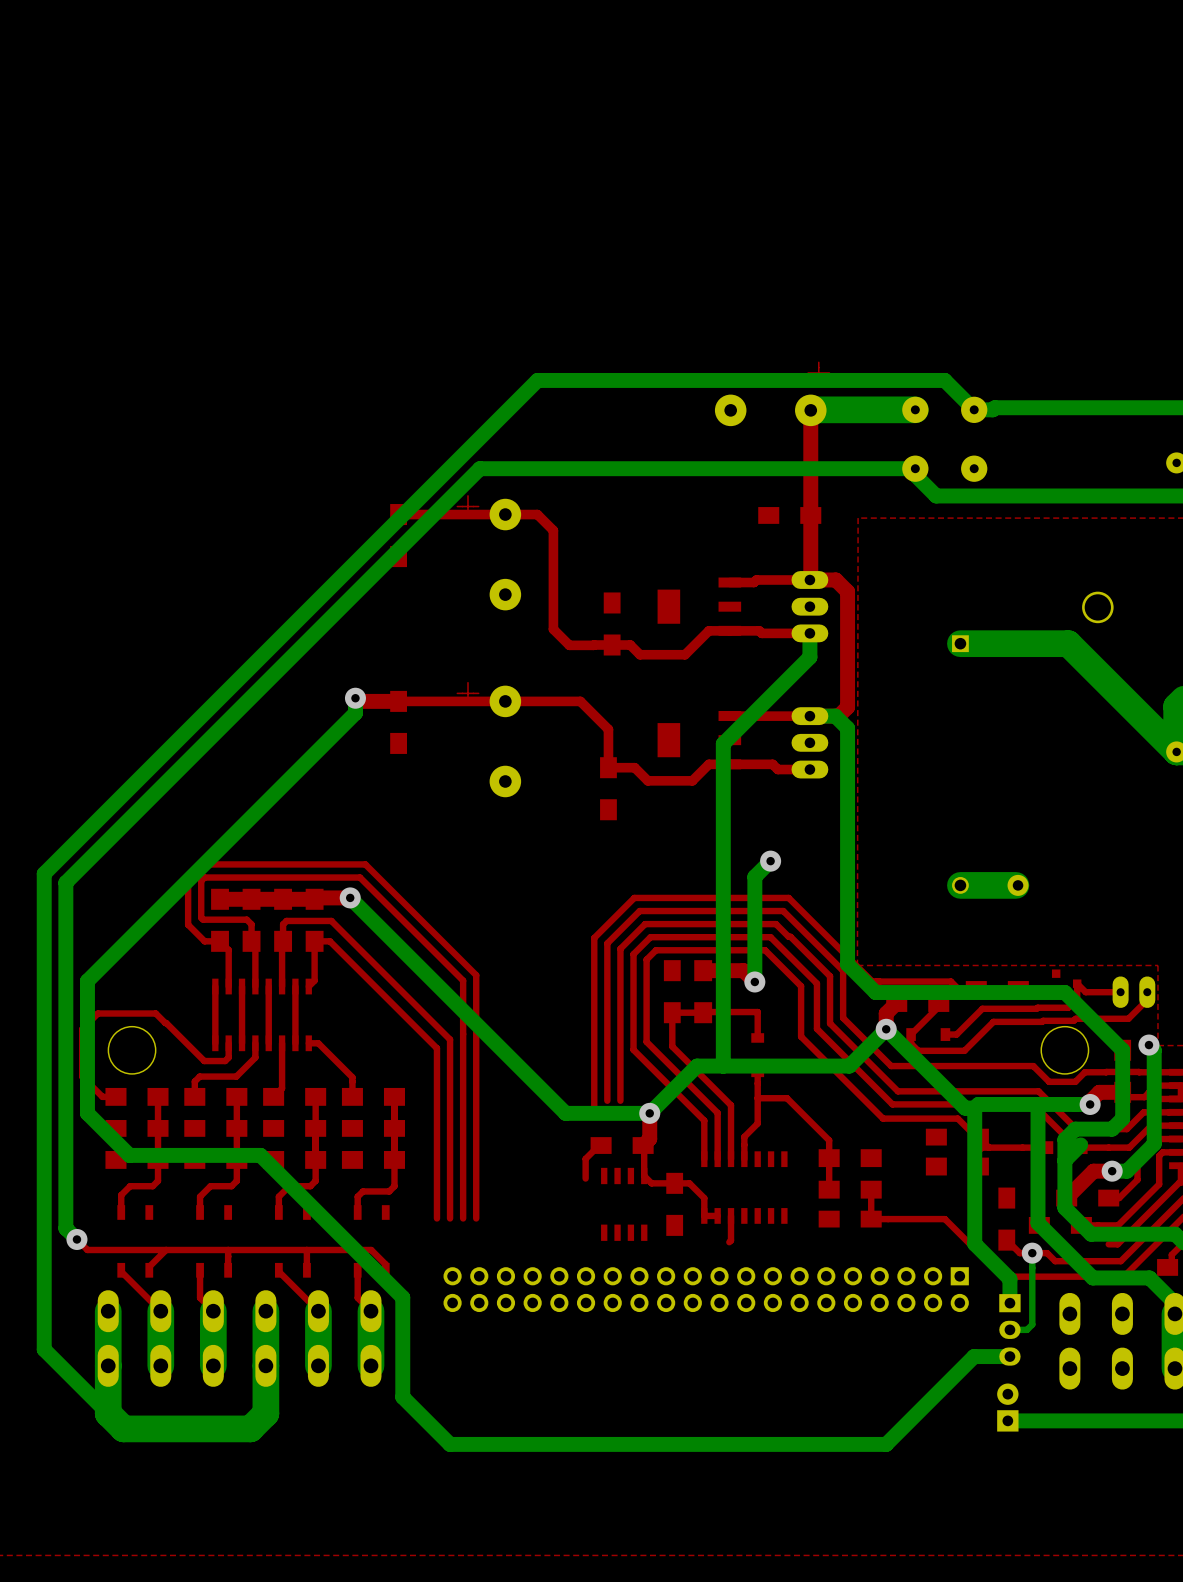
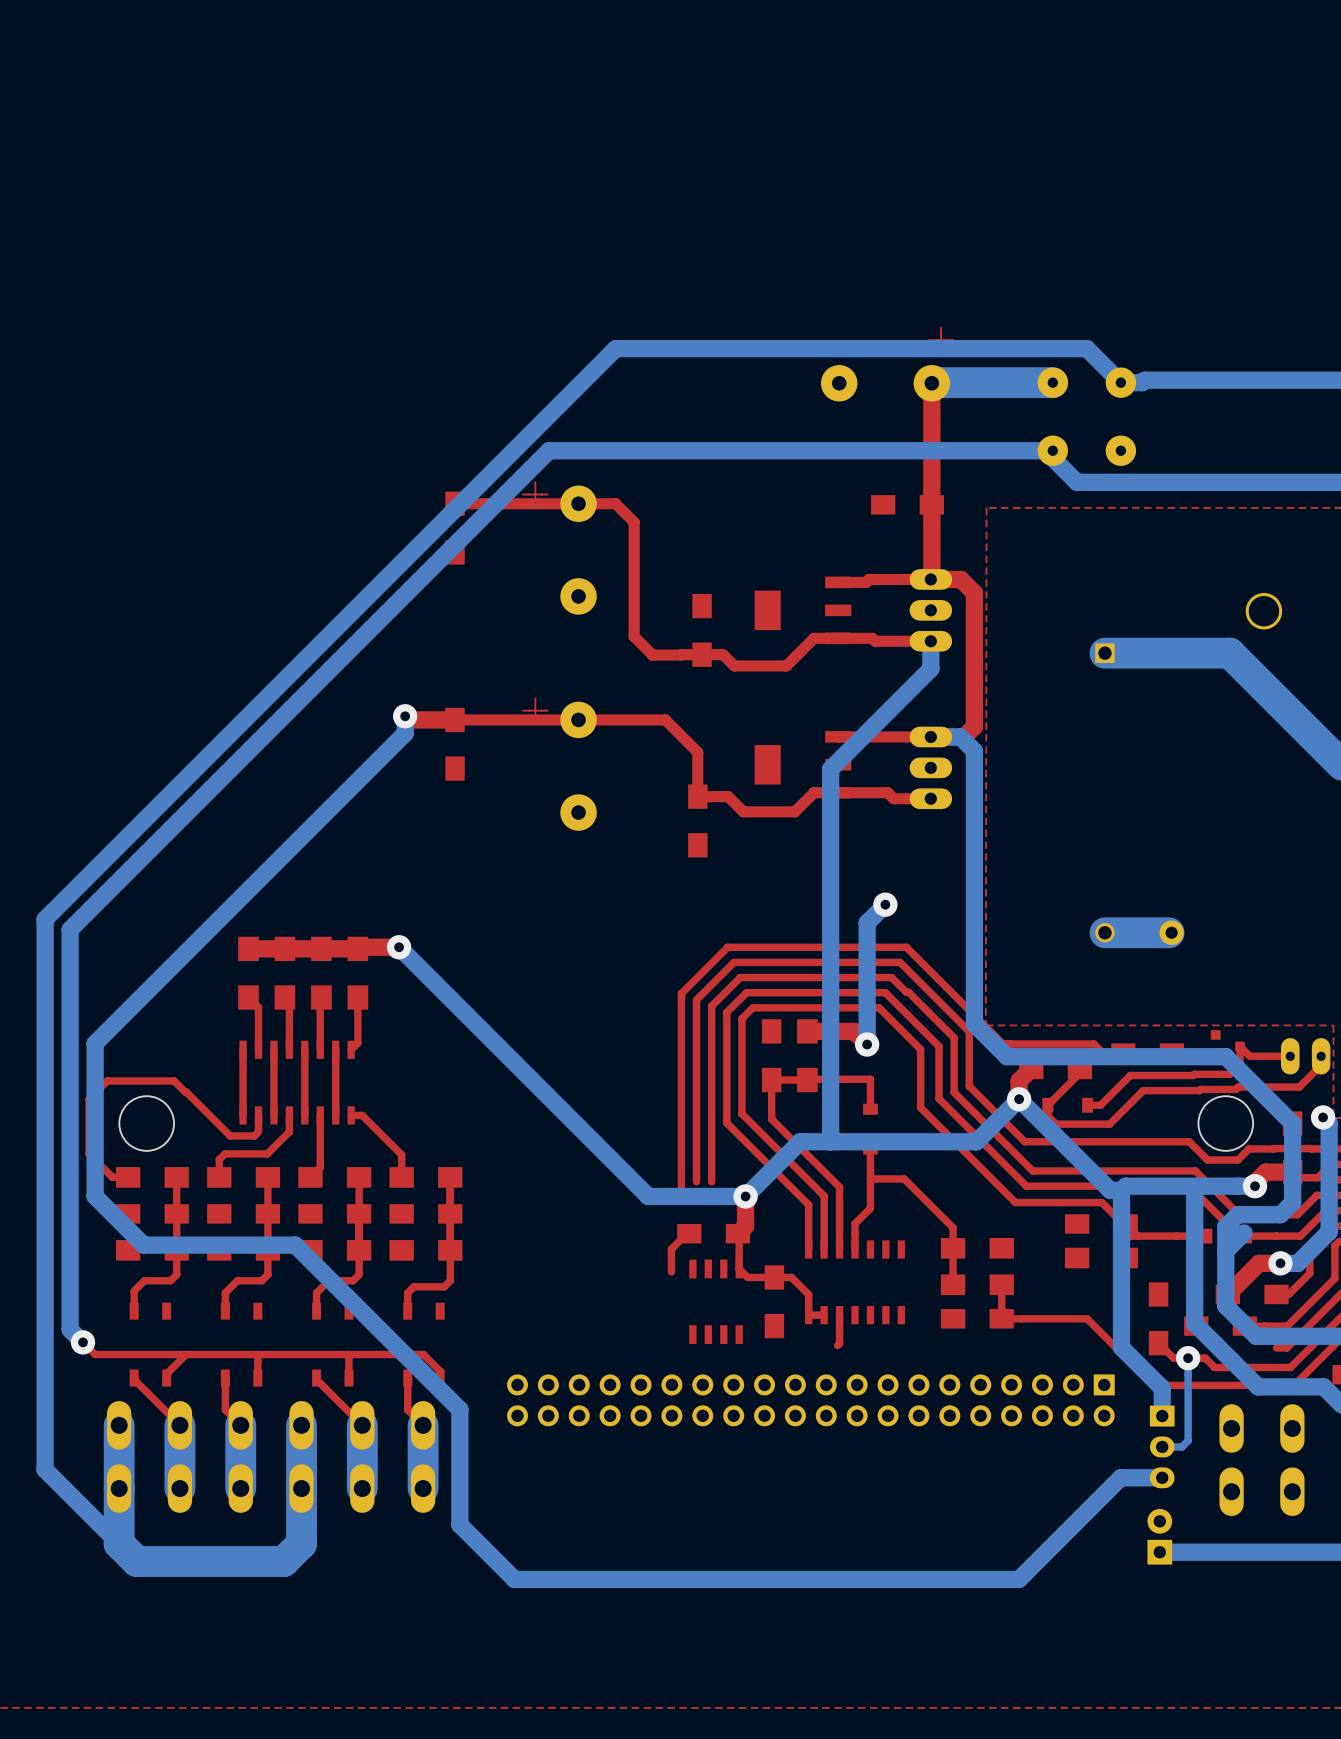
top track: (220, 941) (204, 941) (188, 924) (188, 875) (199, 864) (365, 864) (476, 975) (476, 1218) -> none
top track: (251, 941) (251, 924) (246, 919) (203, 919) (201, 917) (201, 880) (204, 877) (360, 877) (463, 980) (463, 1218) -> none
top track: (283, 941) (283, 924) (286, 920) (331, 920) (450, 1039) (450, 1218) -> none
top track: (314, 941) (329, 941) (436, 1048) (436, 1218) -> none

